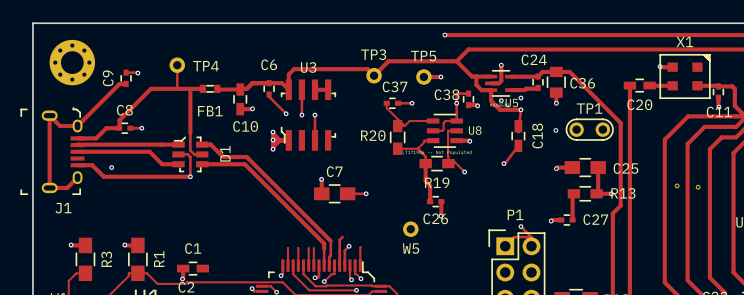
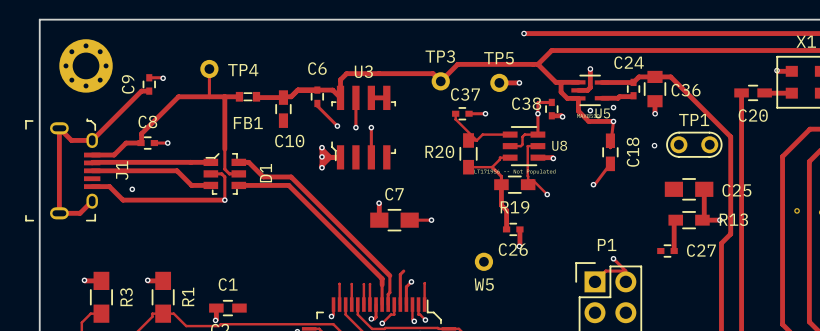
track: (252, 108) (240, 109) -> none
via: (252, 108) -> none
track: (572, 167) (556, 168) -> none
via: (556, 168) -> none
J1 name rotation: 0° (63, 208) -> 90° counterclockwise (122, 170)
J1 name position: J1 (63, 208) -> J1 (122, 170)
track: (561, 220) (551, 221) -> none
via: (551, 221) -> none

